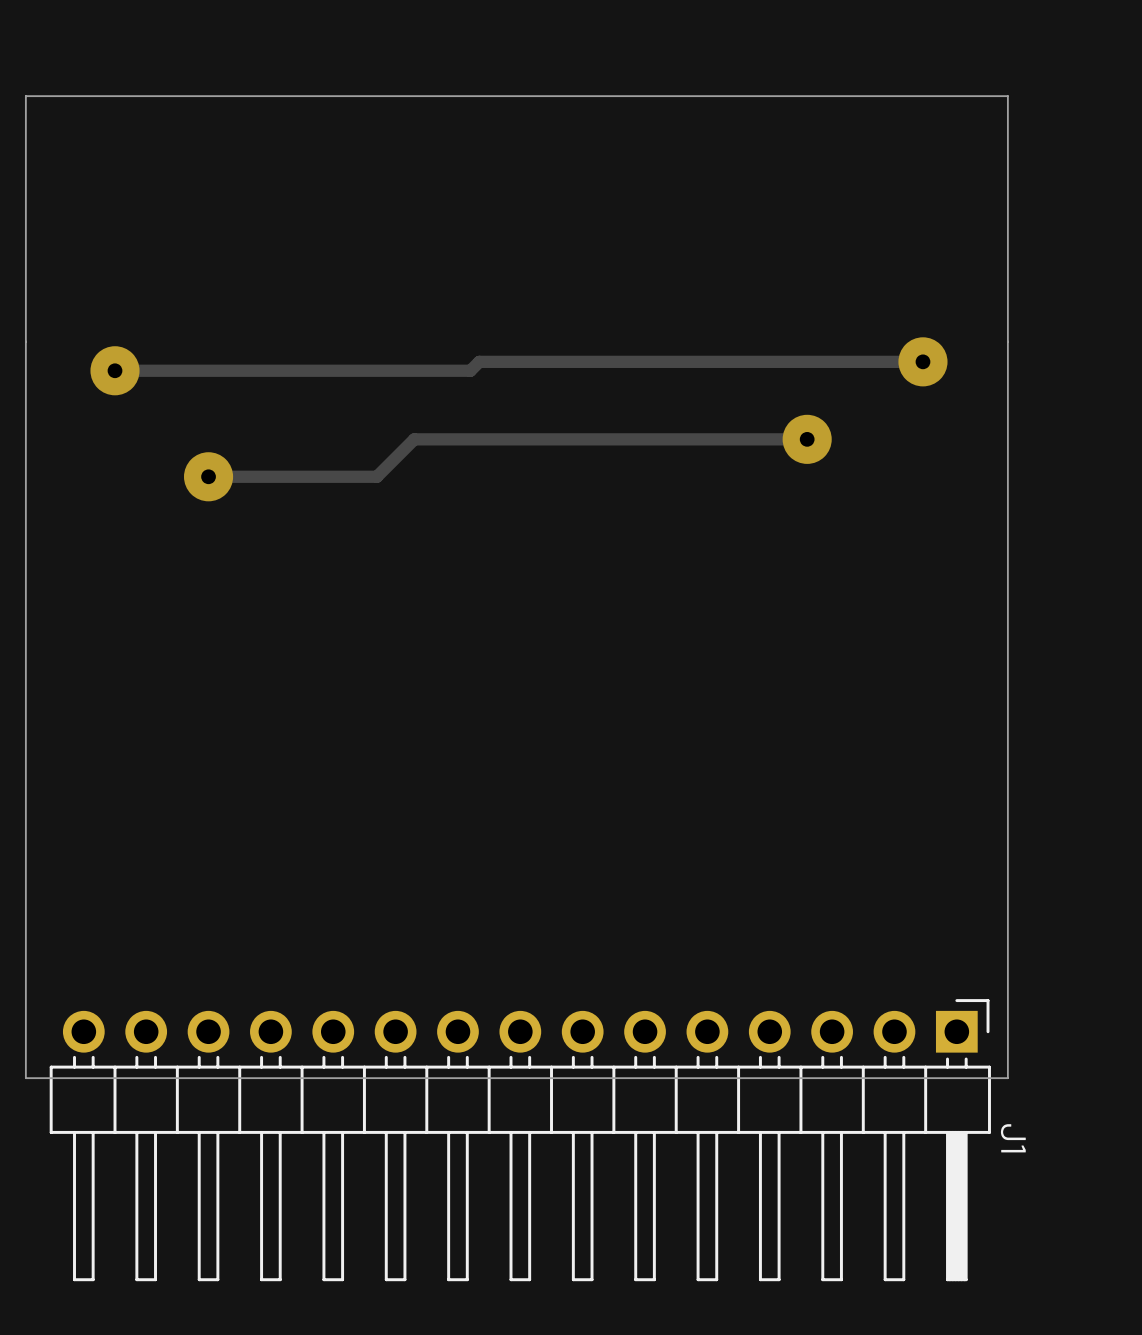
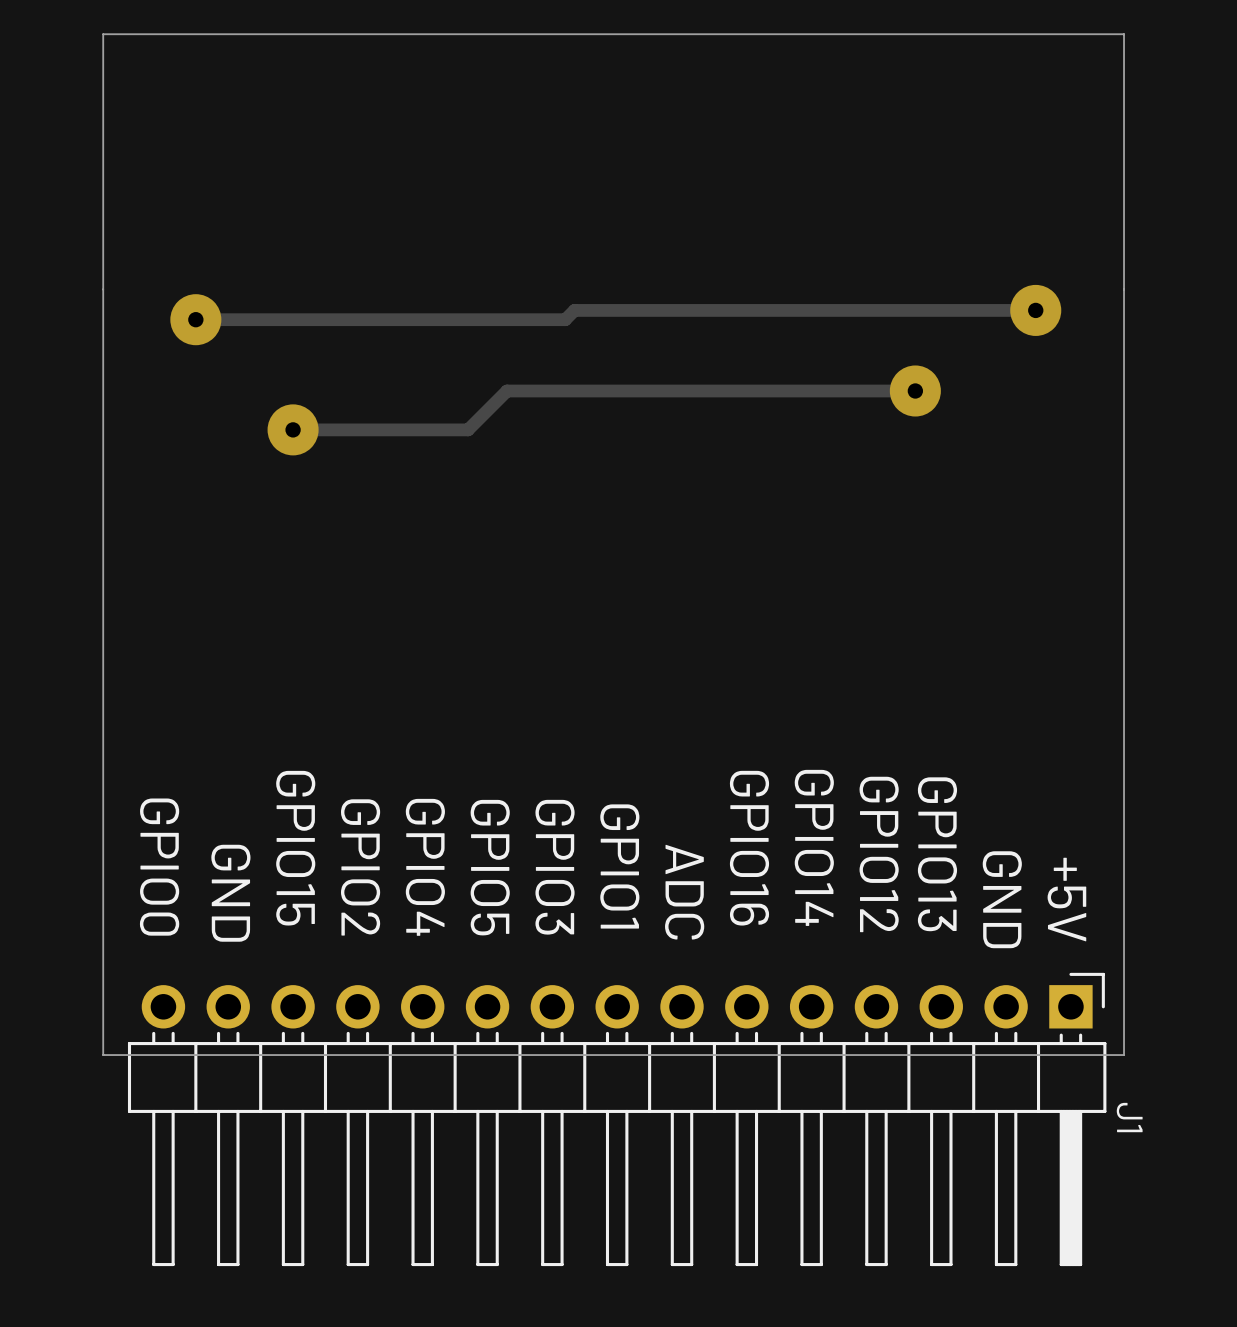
text: none -> GPIO14 (814, 847)
text: none -> GPIO15 (295, 848)
text: none -> GPIO16 (749, 848)
text: none -> GPIO12 (879, 854)
text: none -> GPIO13 (937, 854)
text: none -> GPIO1 (619, 866)
text: none -> GPIO0 (159, 867)
text: none -> GPIO2 (360, 867)
text: none -> GPIO4 (425, 867)
text: none -> GPIO5 (490, 867)
text: none -> GPIO3 (555, 867)
text: none -> ADC (684, 892)
text: none -> GND (230, 893)
text: none -> GND (1002, 899)
text: none -> +5V (1066, 899)

